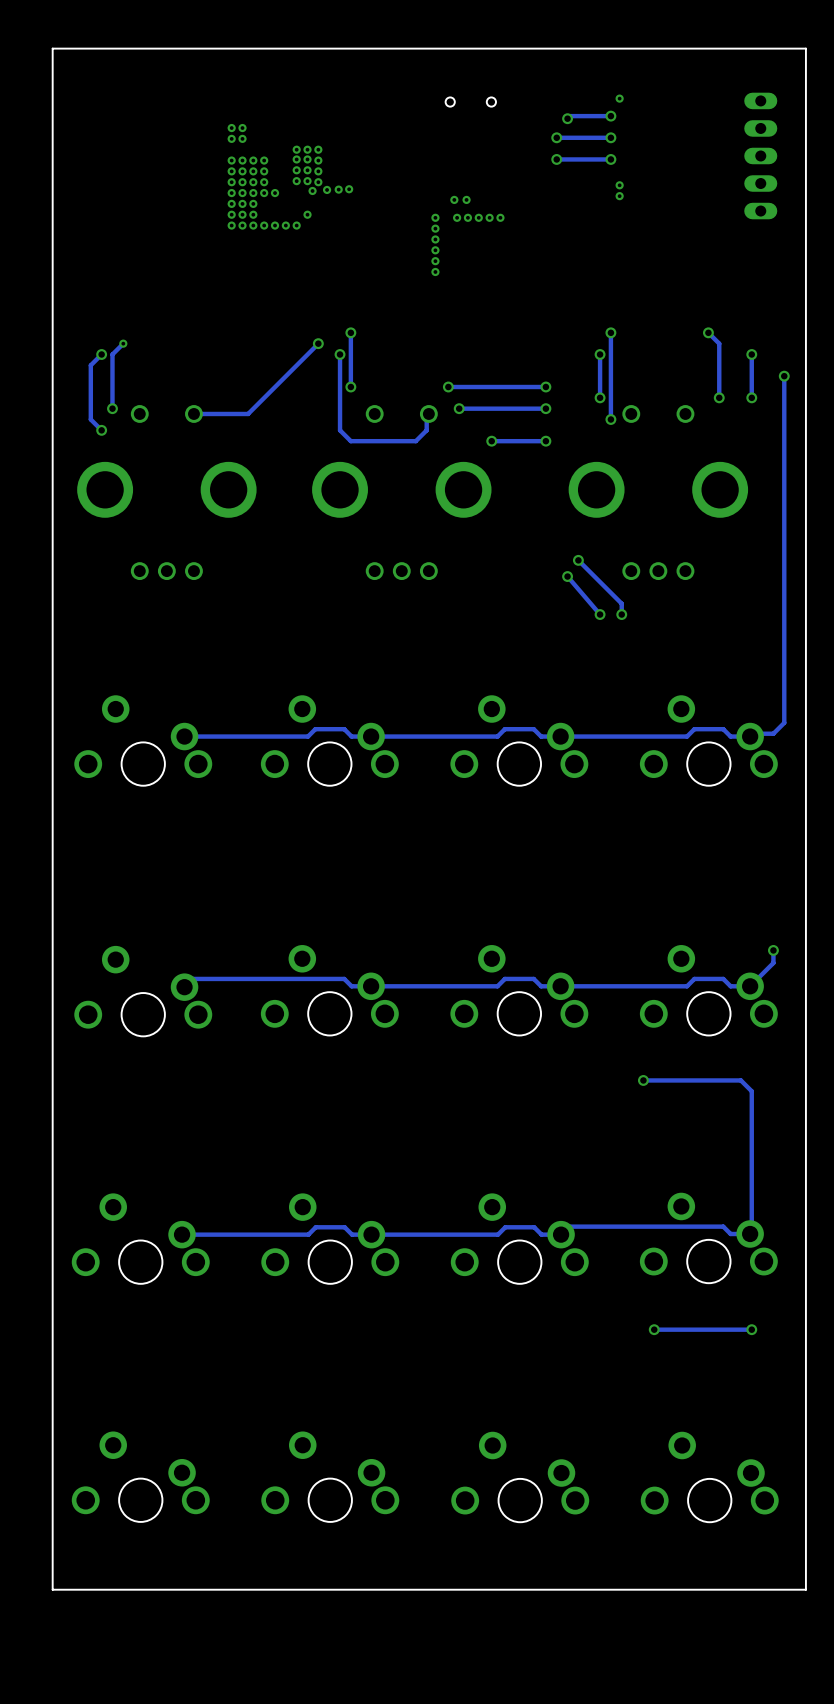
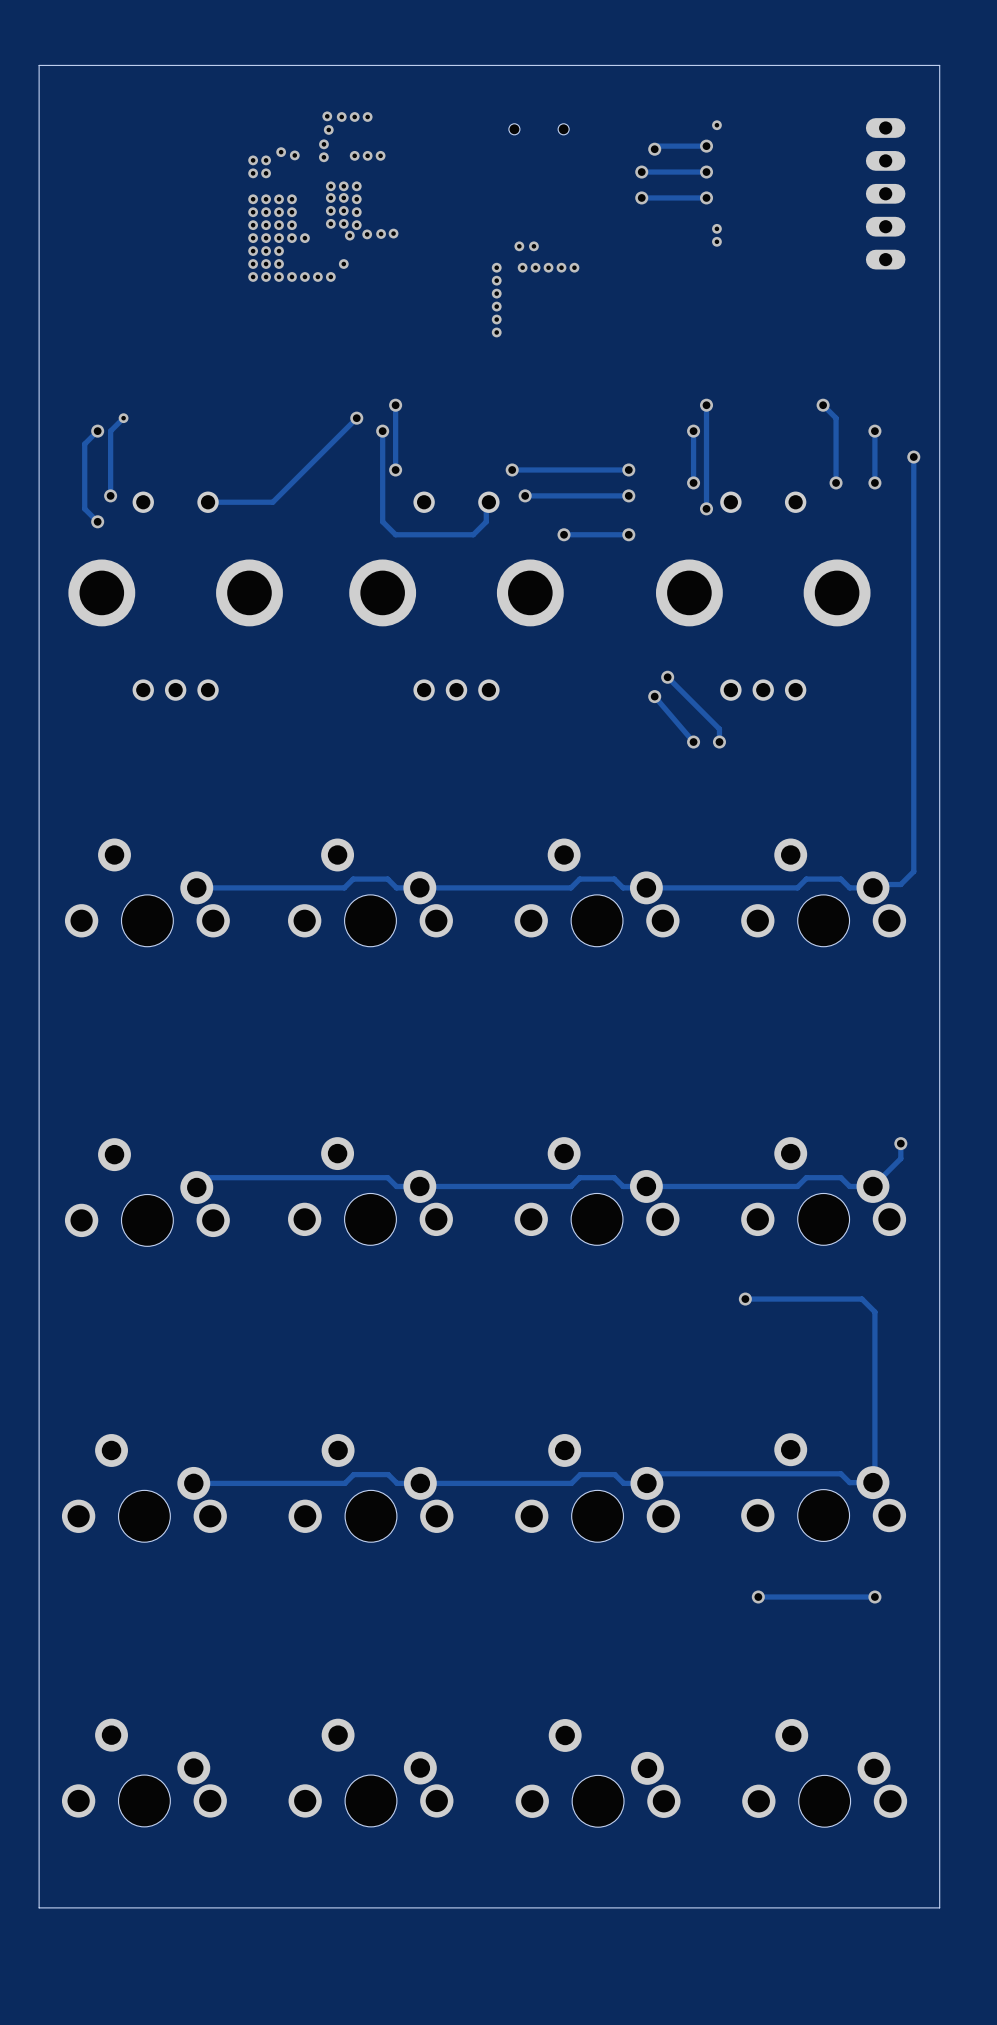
via: none -> (327, 116)
via: none -> (341, 116)
via: none -> (354, 116)
via: none -> (367, 116)
via: none -> (328, 129)
via: none -> (323, 144)
via: none -> (281, 152)
via: none -> (294, 155)
via: none -> (354, 155)
via: none -> (367, 155)
via: none -> (380, 155)
via: none -> (323, 157)

